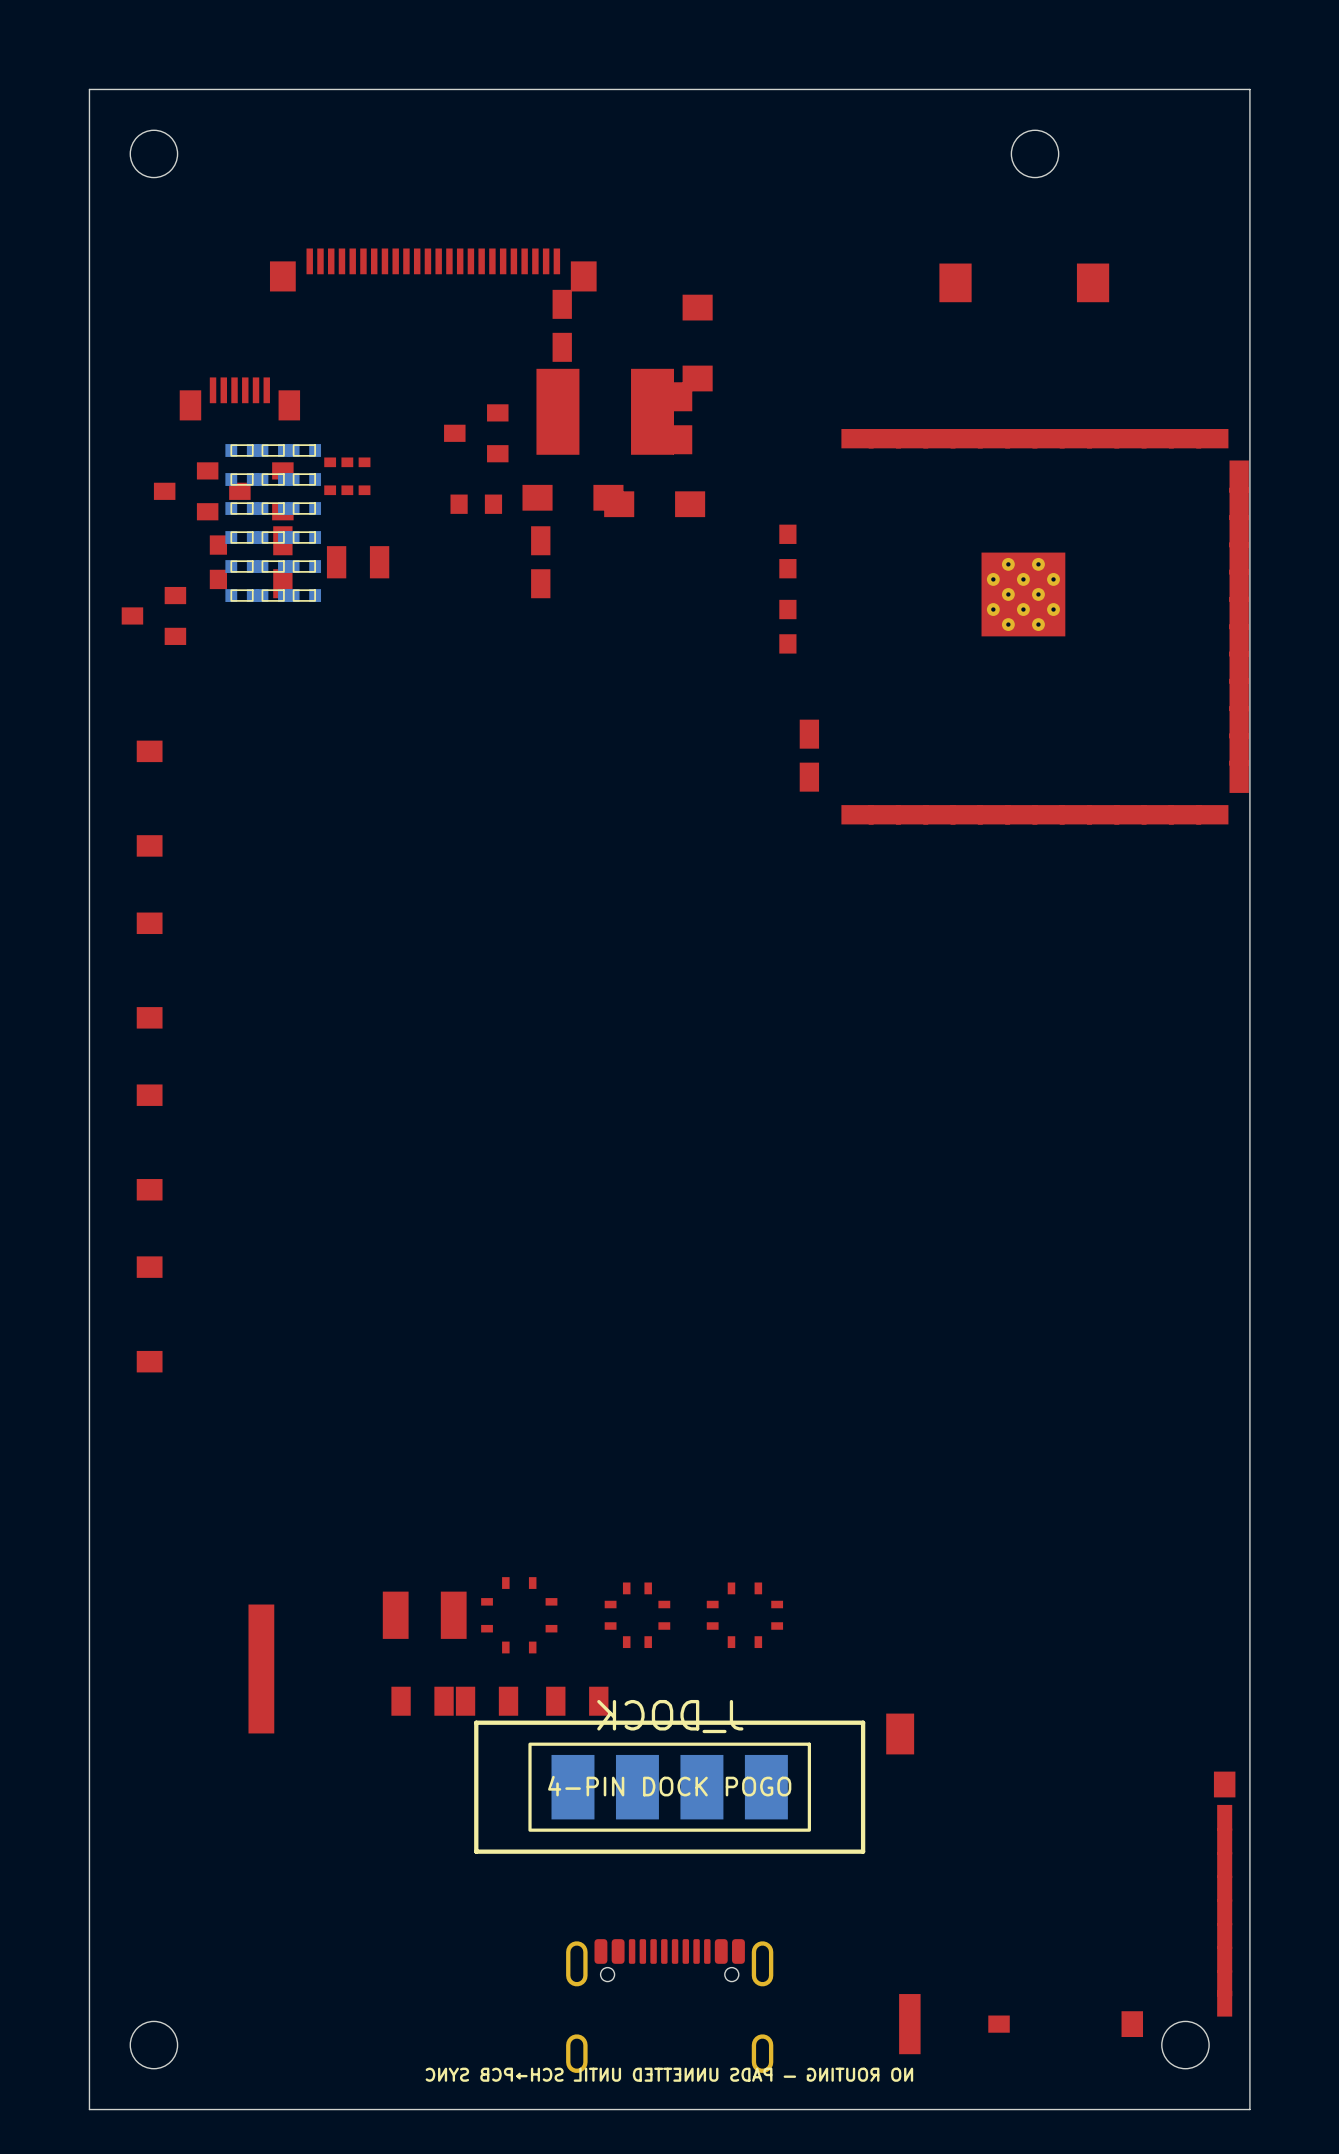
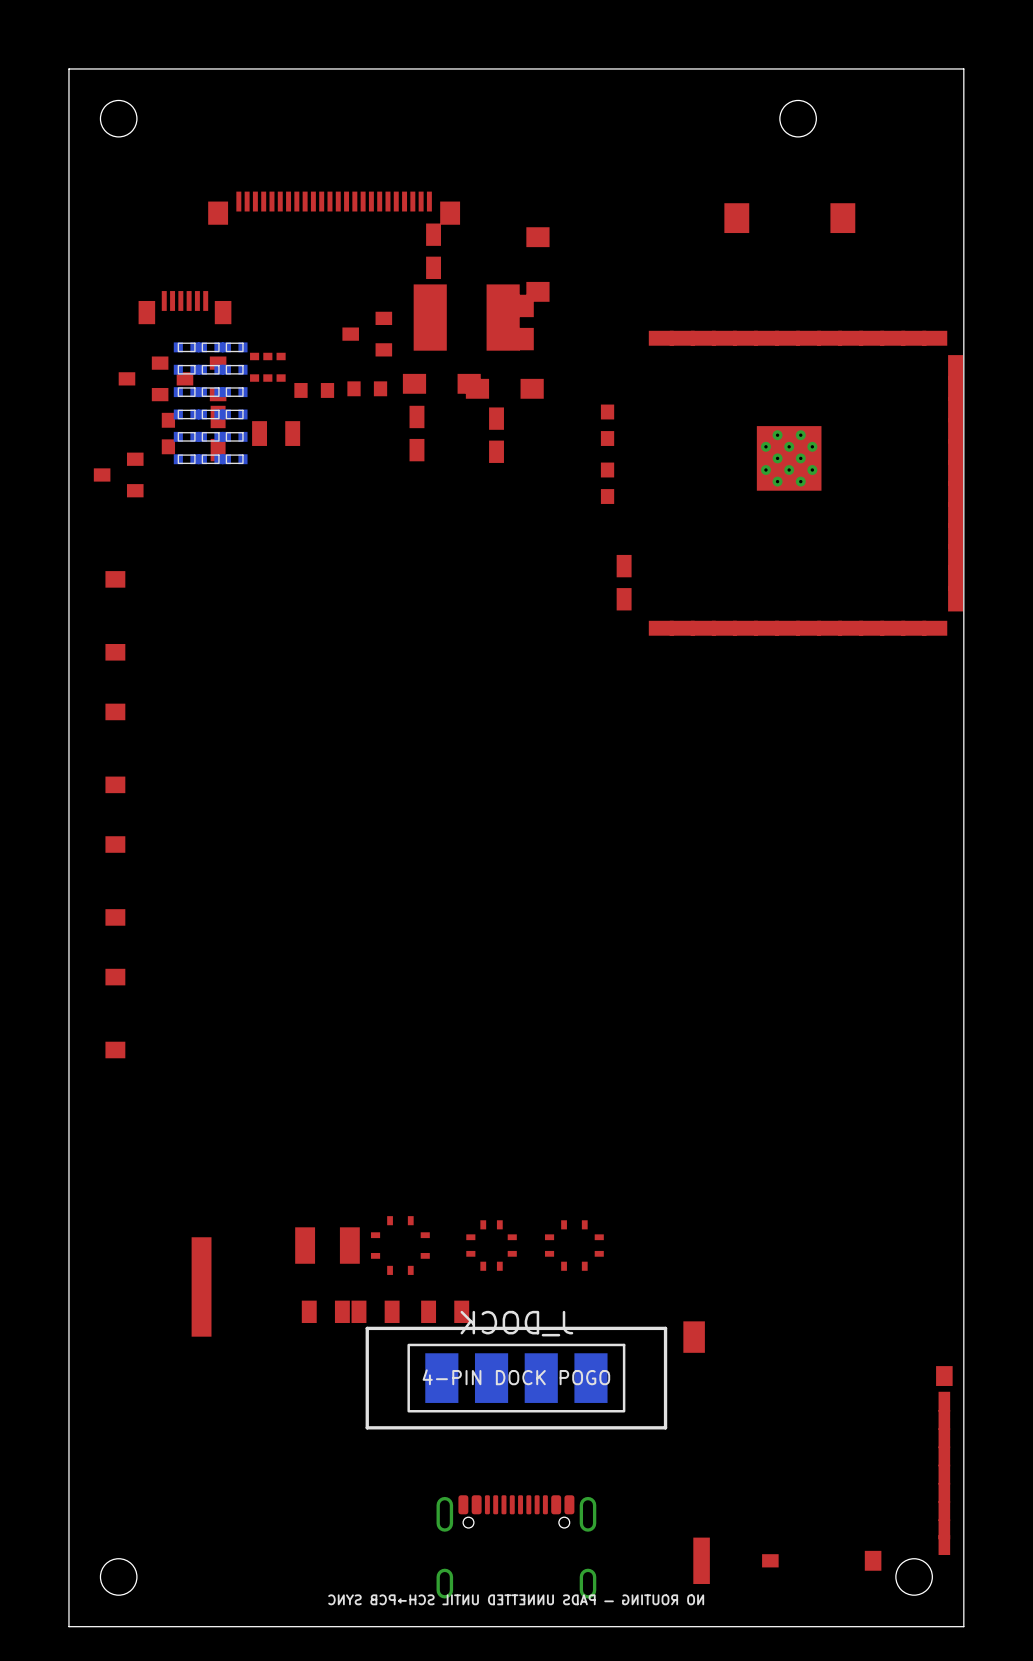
part: none -> (314, 390)
part: none -> (496, 435)

